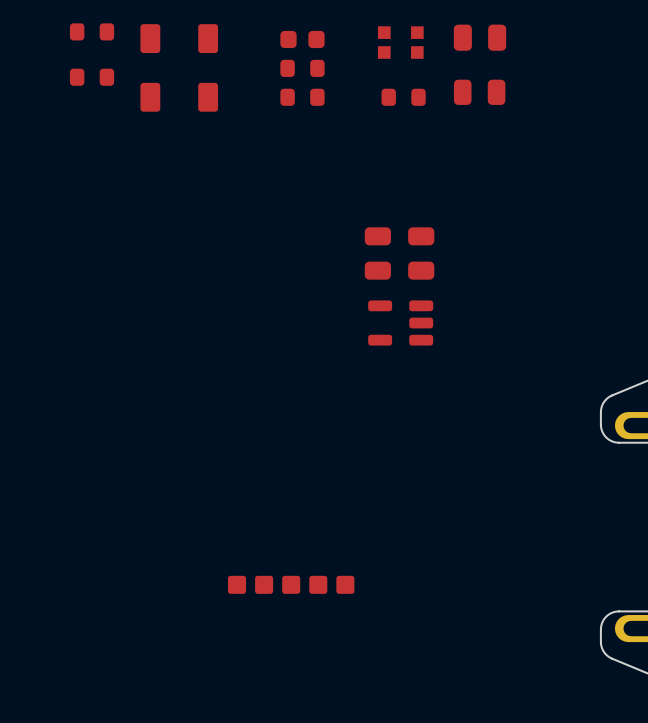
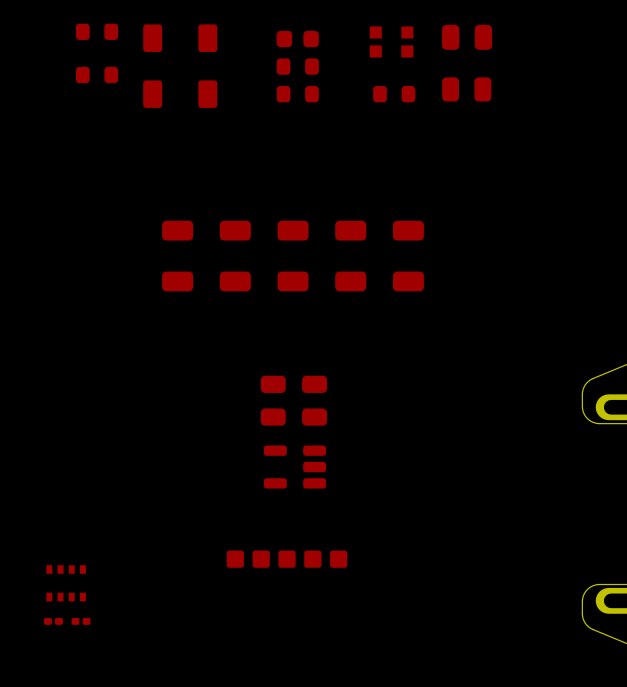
part footprint: [408, 227, 435, 280] -> [392, 220, 424, 292]
part: (377, 253) -> none
part: none -> (177, 256)
part: none -> (235, 256)
part: none -> (293, 256)
part: none -> (350, 256)
part position: (400, 323) -> (294, 467)
part: none -> (273, 400)
part: none -> (314, 400)
part: none -> (66, 583)
part: none -> (53, 621)
part: none -> (81, 621)

